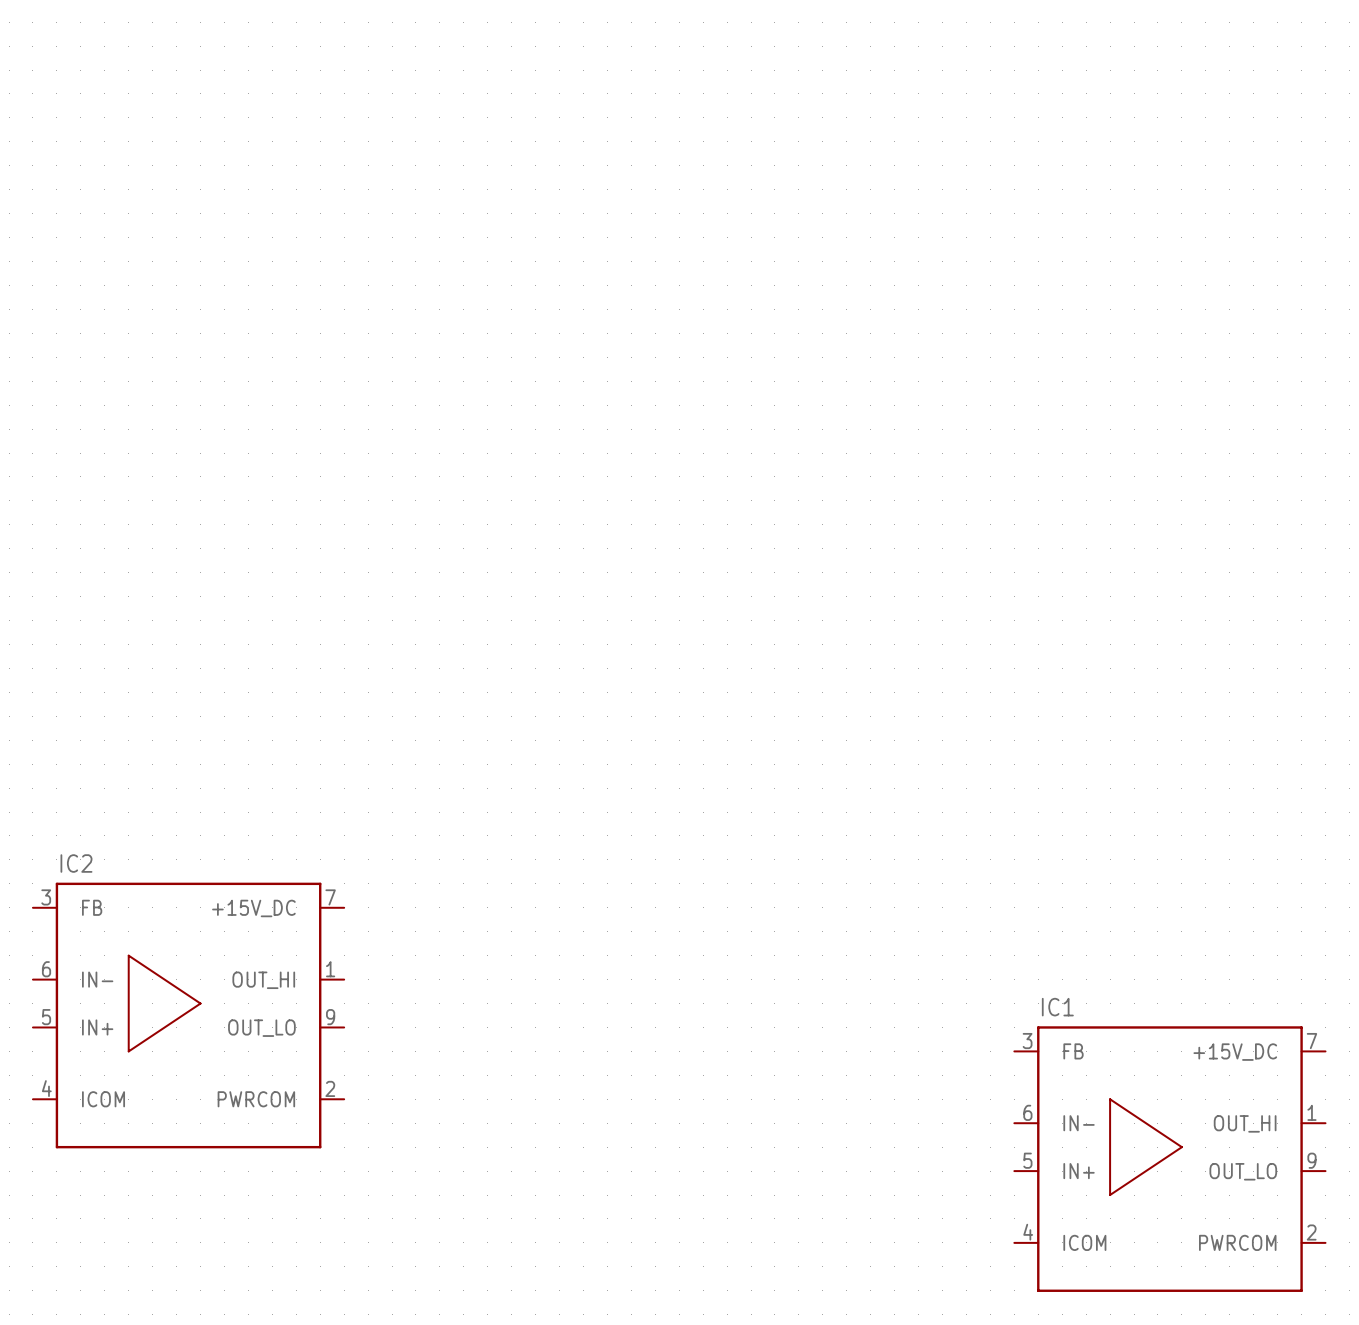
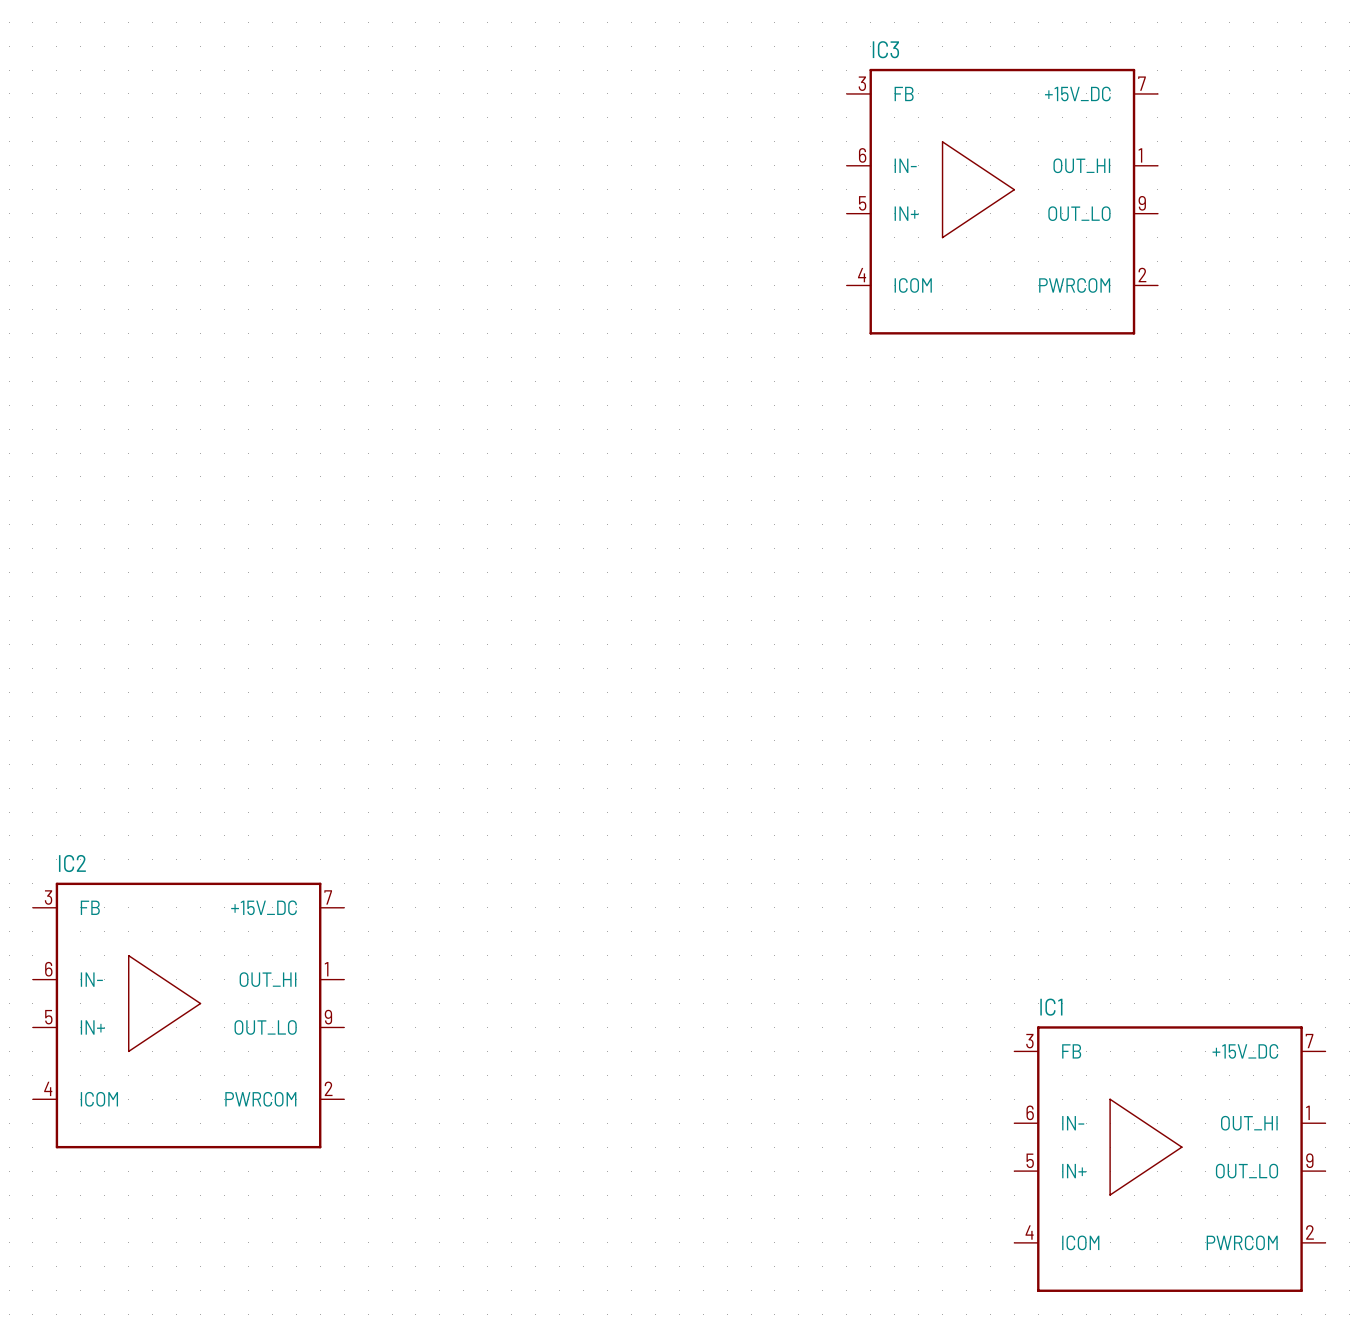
IC3: none -> (1002, 201)

